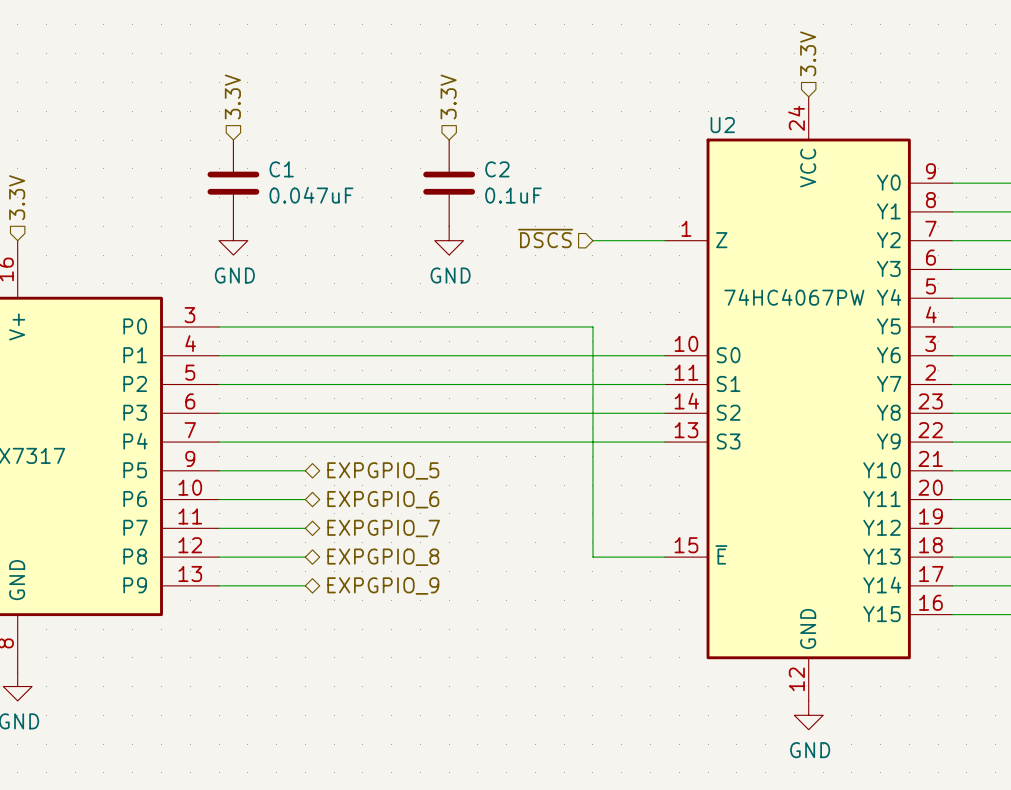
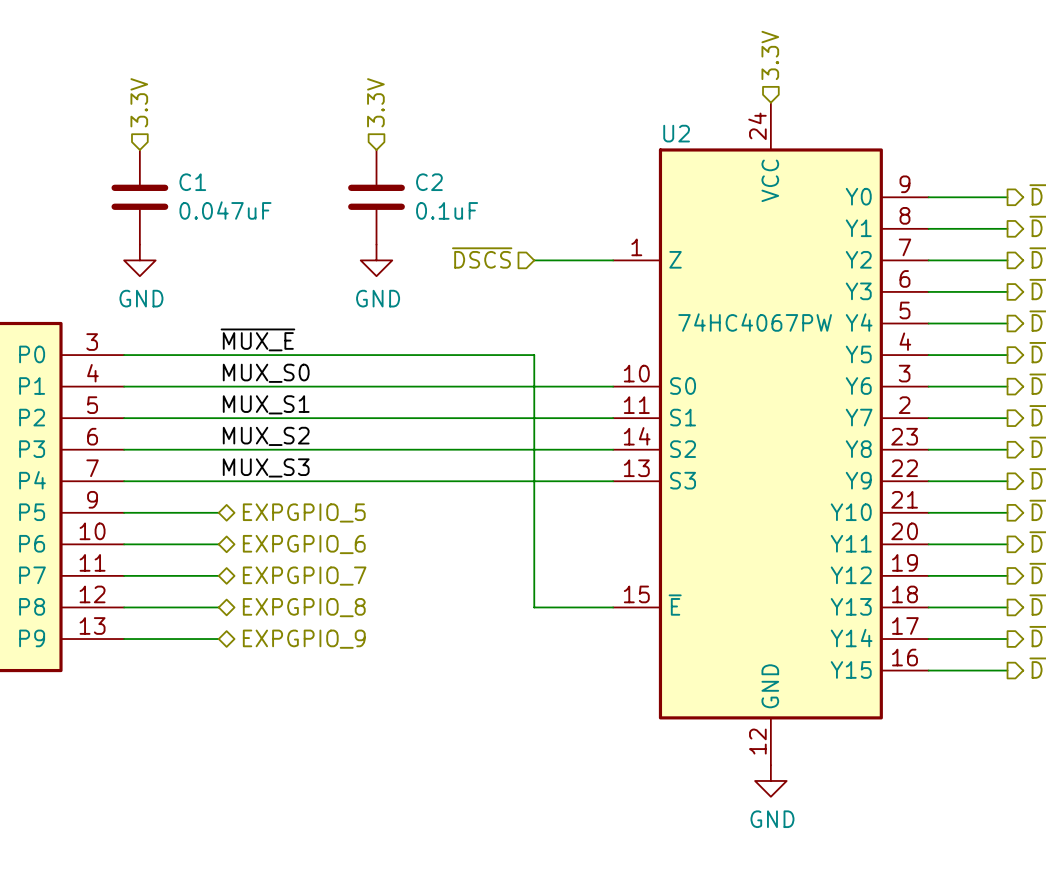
label: none -> ~{MUX_E} (257, 339)
label: none -> MUX_S0 (266, 373)
label: none -> MUX_S1 (266, 404)
label: none -> MUX_S2 (266, 436)
label: none -> MUX_S3 (266, 467)

